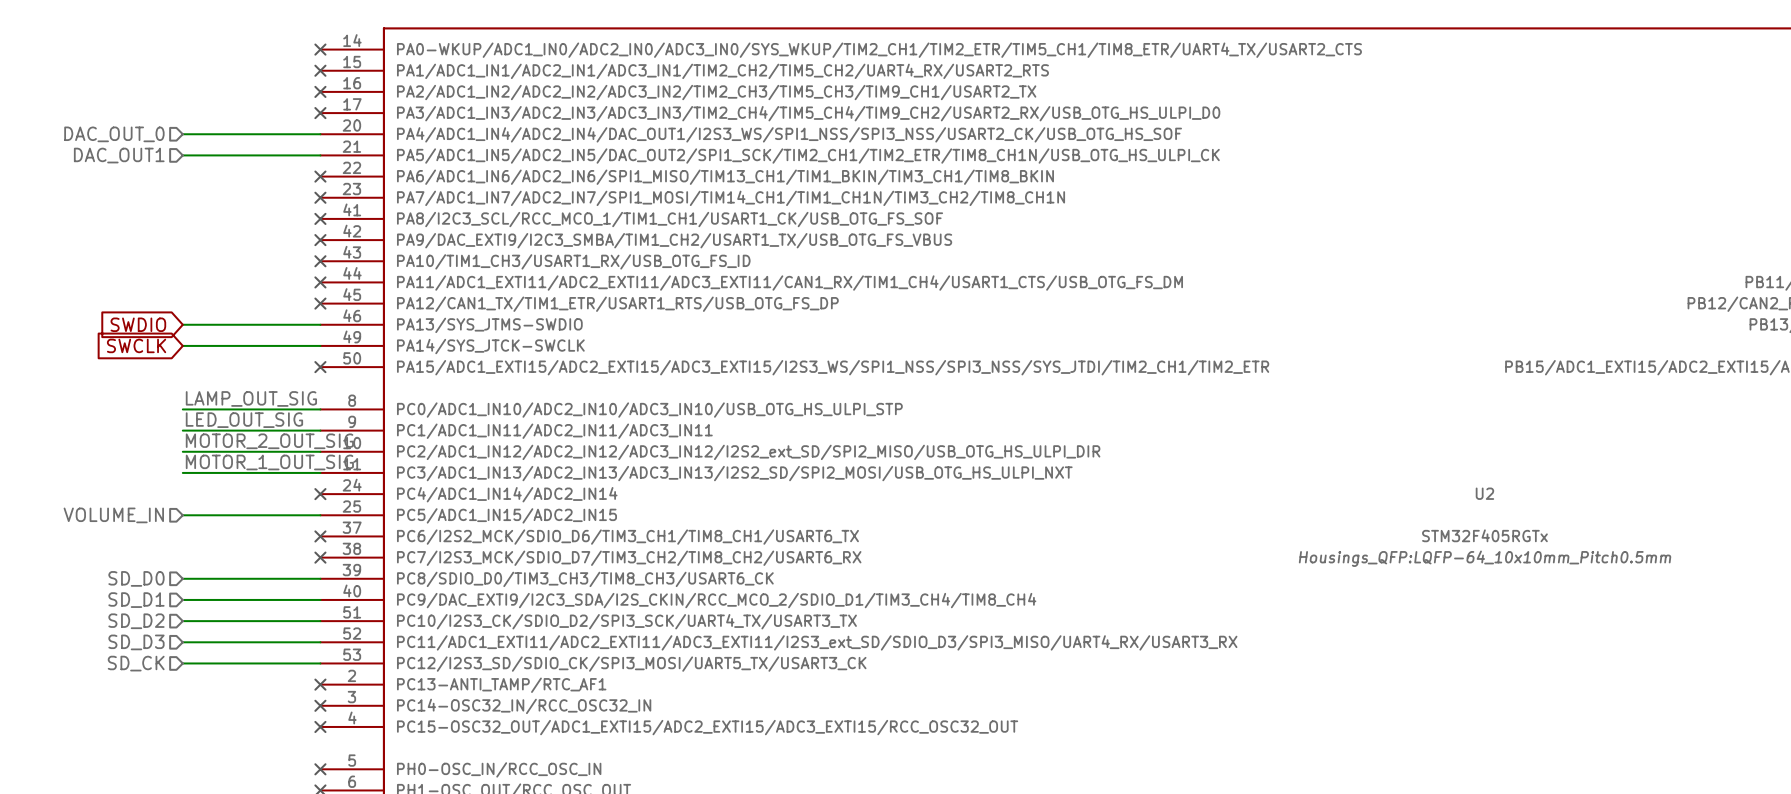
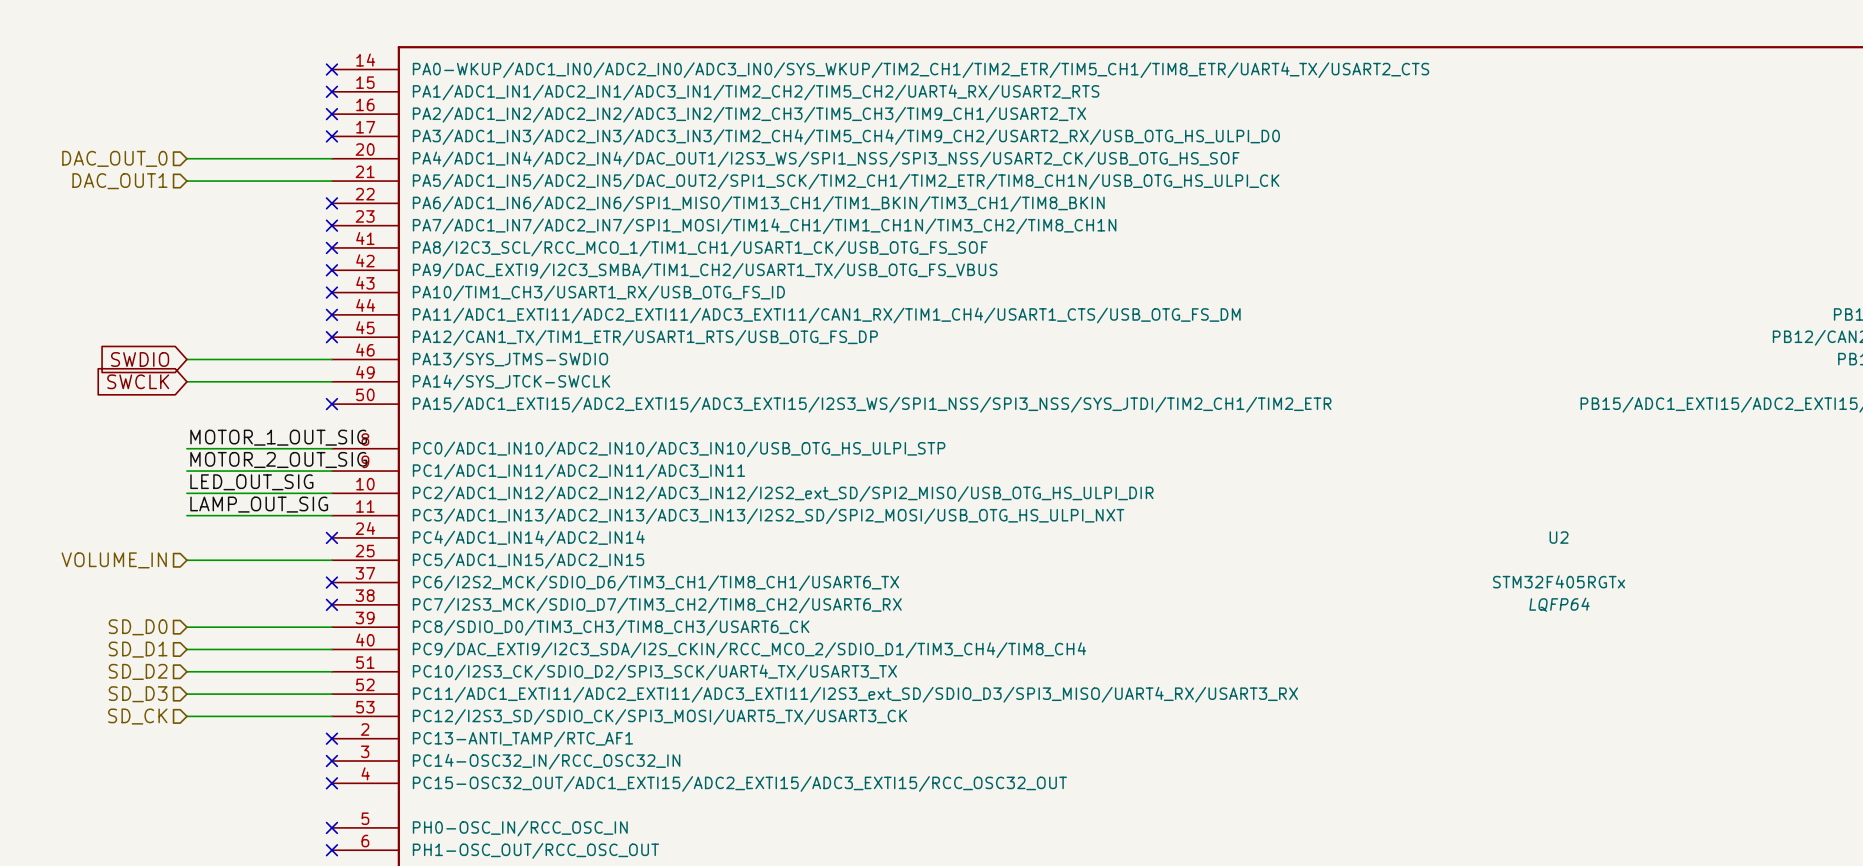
label: LAMP_OUT_SIG (251, 398) -> MOTOR_1_OUT_SIG (278, 437)
label: LED_OUT_SIG (244, 420) -> MOTOR_2_OUT_SIG (278, 459)
label: MOTOR_2_OUT_SIG (269, 441) -> LED_OUT_SIG (251, 482)
label: MOTOR_1_OUT_SIG (269, 462) -> LAMP_OUT_SIG (259, 504)
U2 text: Housings_QFP:LQFP-64_10x10mm_Pitch0.5mm (1485, 558) -> LQFP64 (1559, 604)

